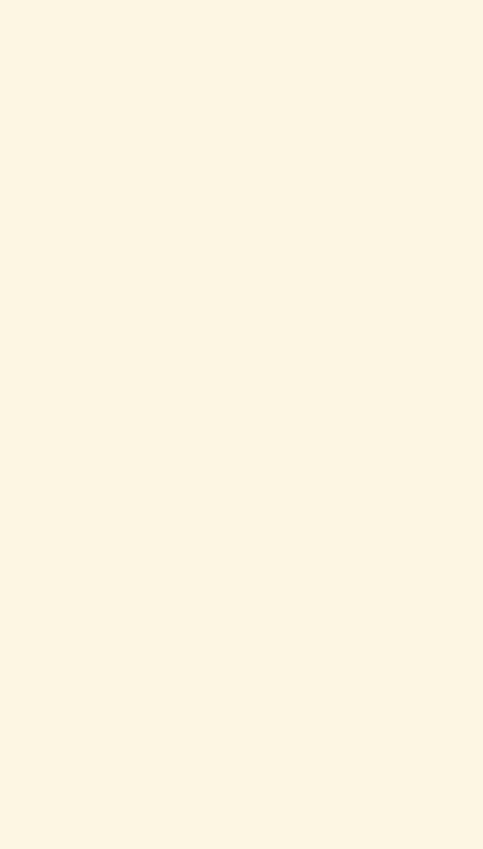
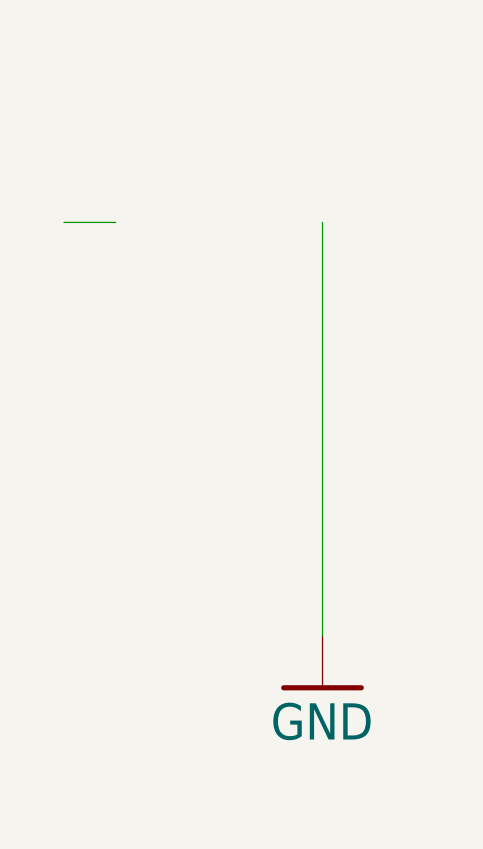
wire: none -> (63, 222) (115, 222)
wire: none -> (322, 222) (322, 636)
power symbol: none -> GND (322, 663)

